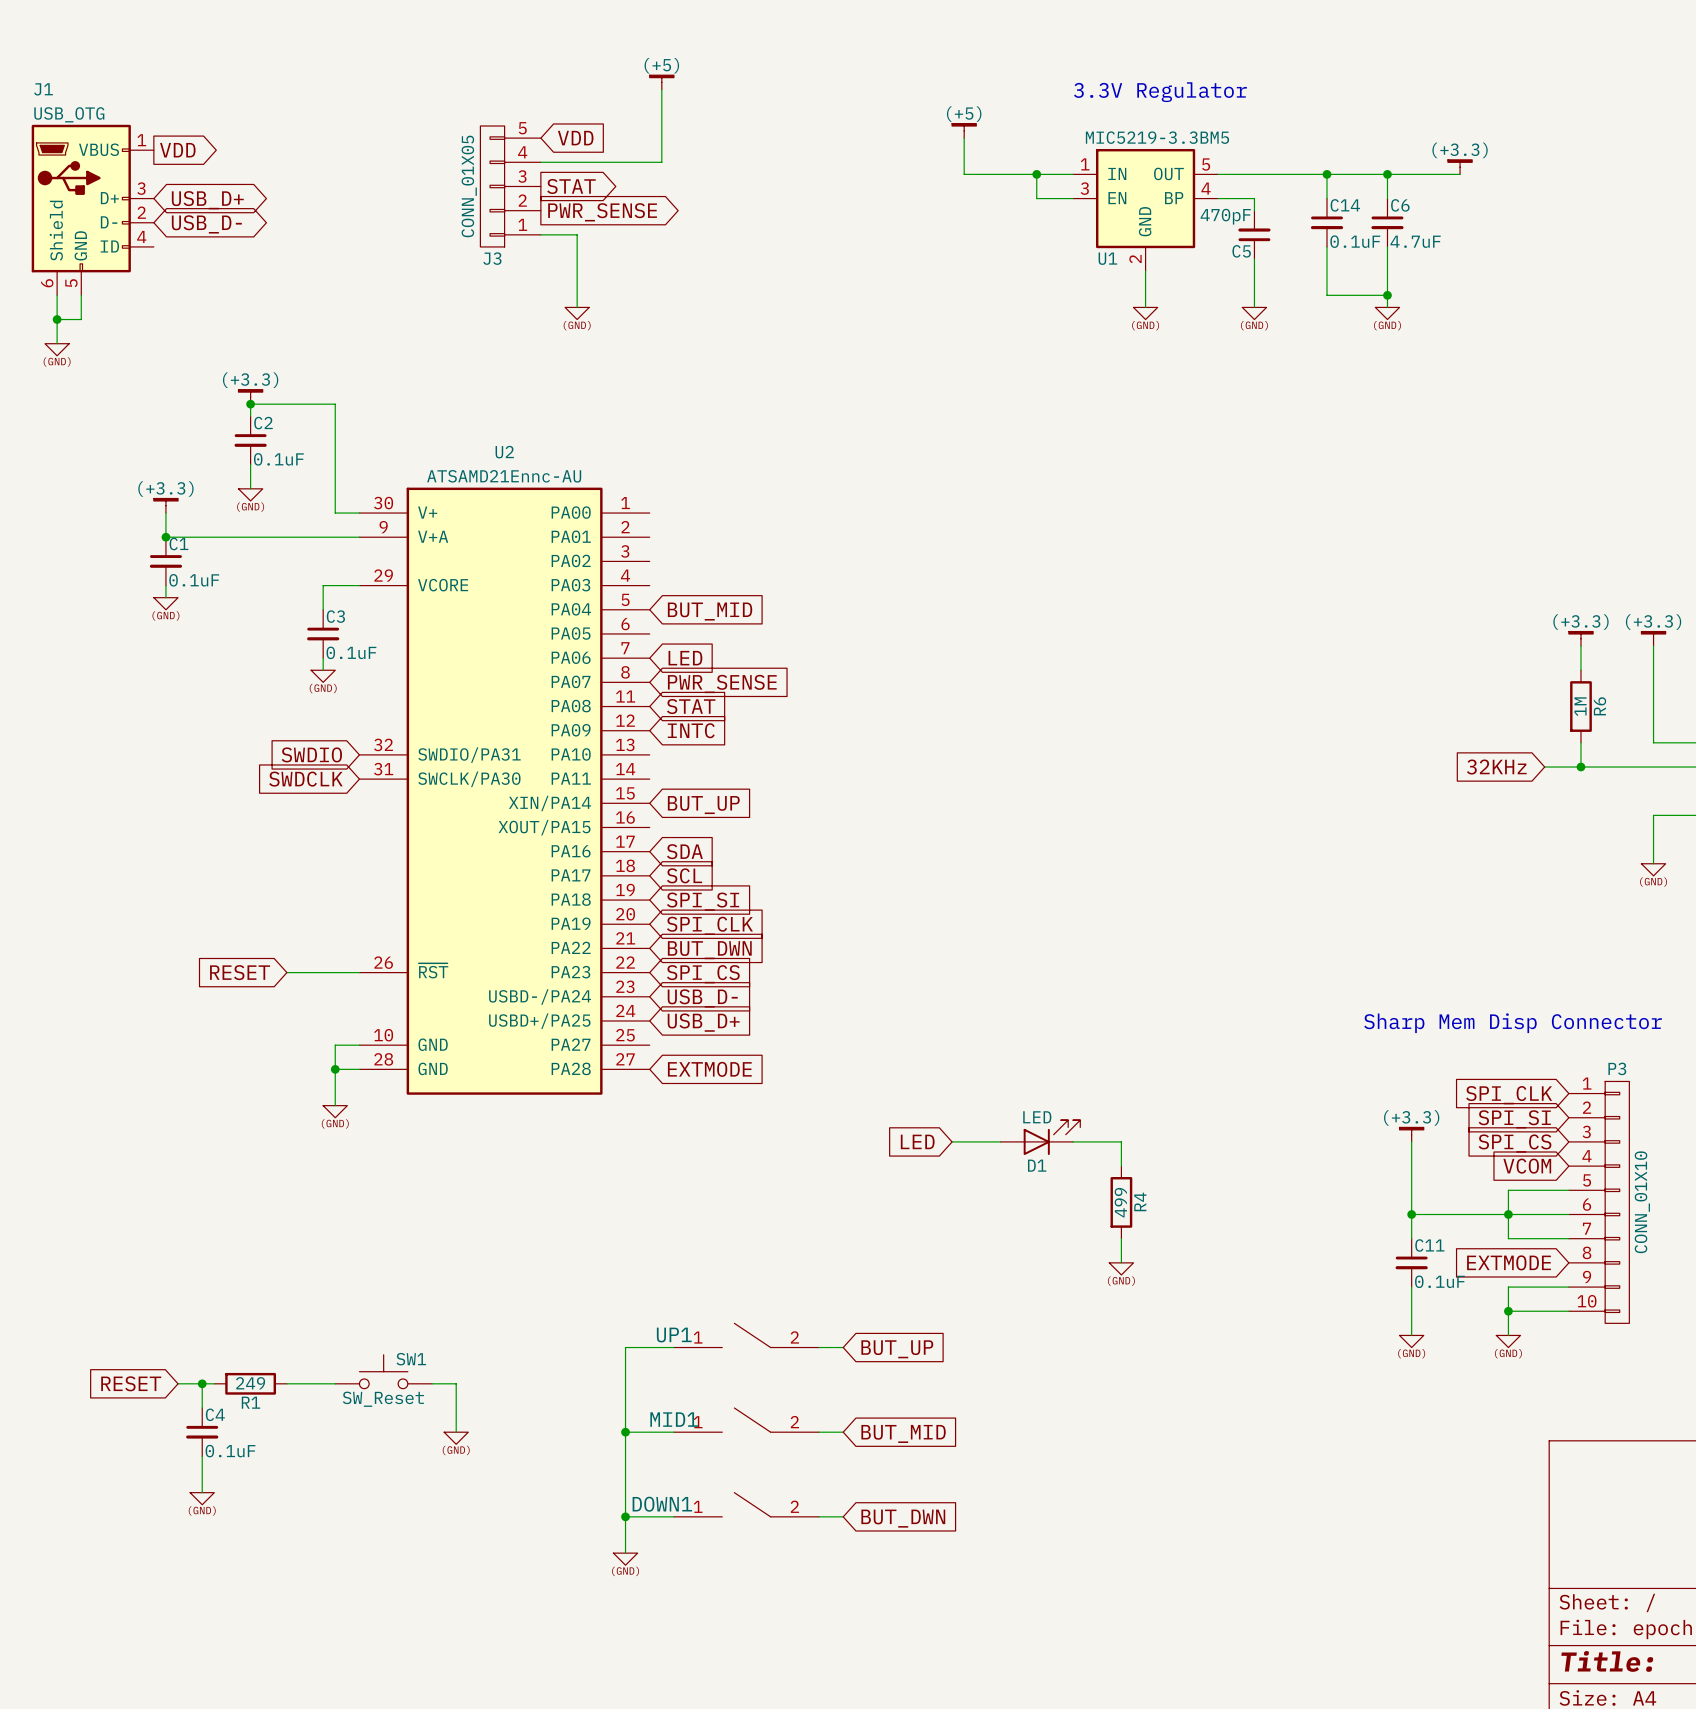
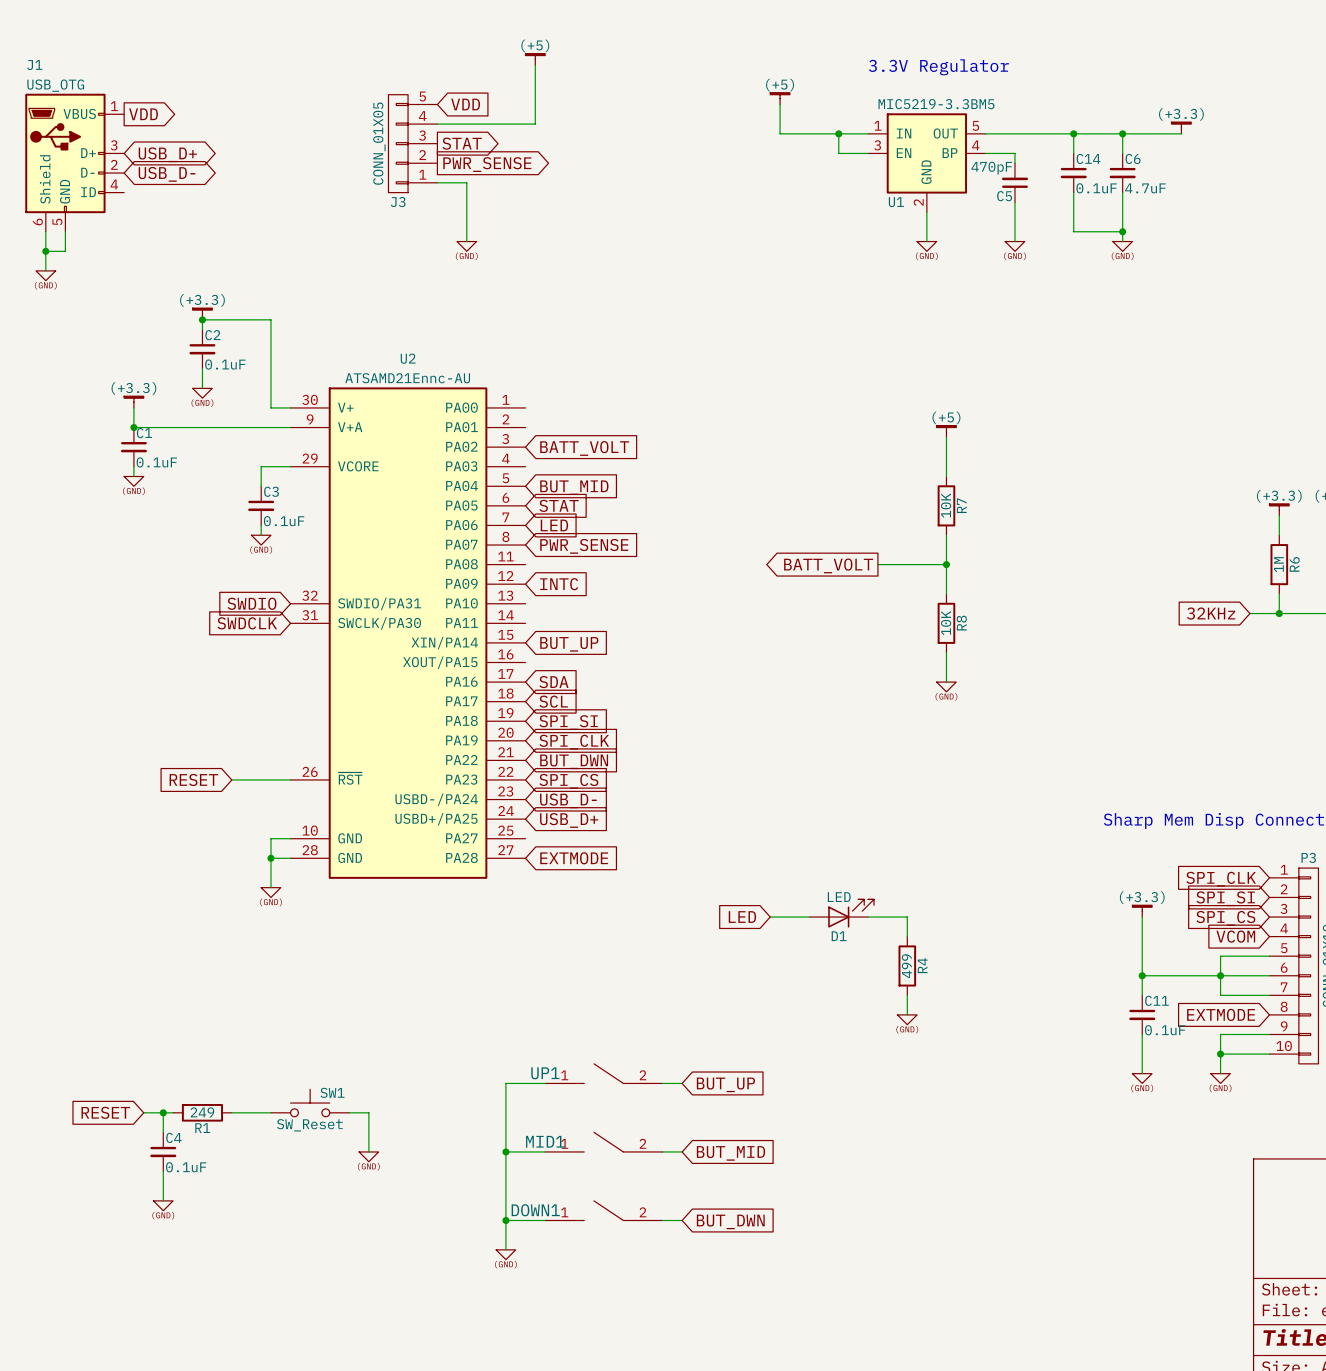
power symbol: none -> (+5) (946, 431)
wire: none -> (946, 437) (946, 476)
global label: none -> BATT_VOLT (584, 448)
R7: none -> 10K (946, 505)
wire: none -> (946, 535) (946, 593)
global label position: STAT (691, 706) -> STAT (559, 505)
wire: none -> (877, 564) (946, 564)
junction: none -> (946, 564)
global label: none -> BATT_VOLT (828, 565)
R8: none -> 10K (946, 623)
wire: none -> (946, 652) (946, 682)
power symbol: none -> (946, 686)

